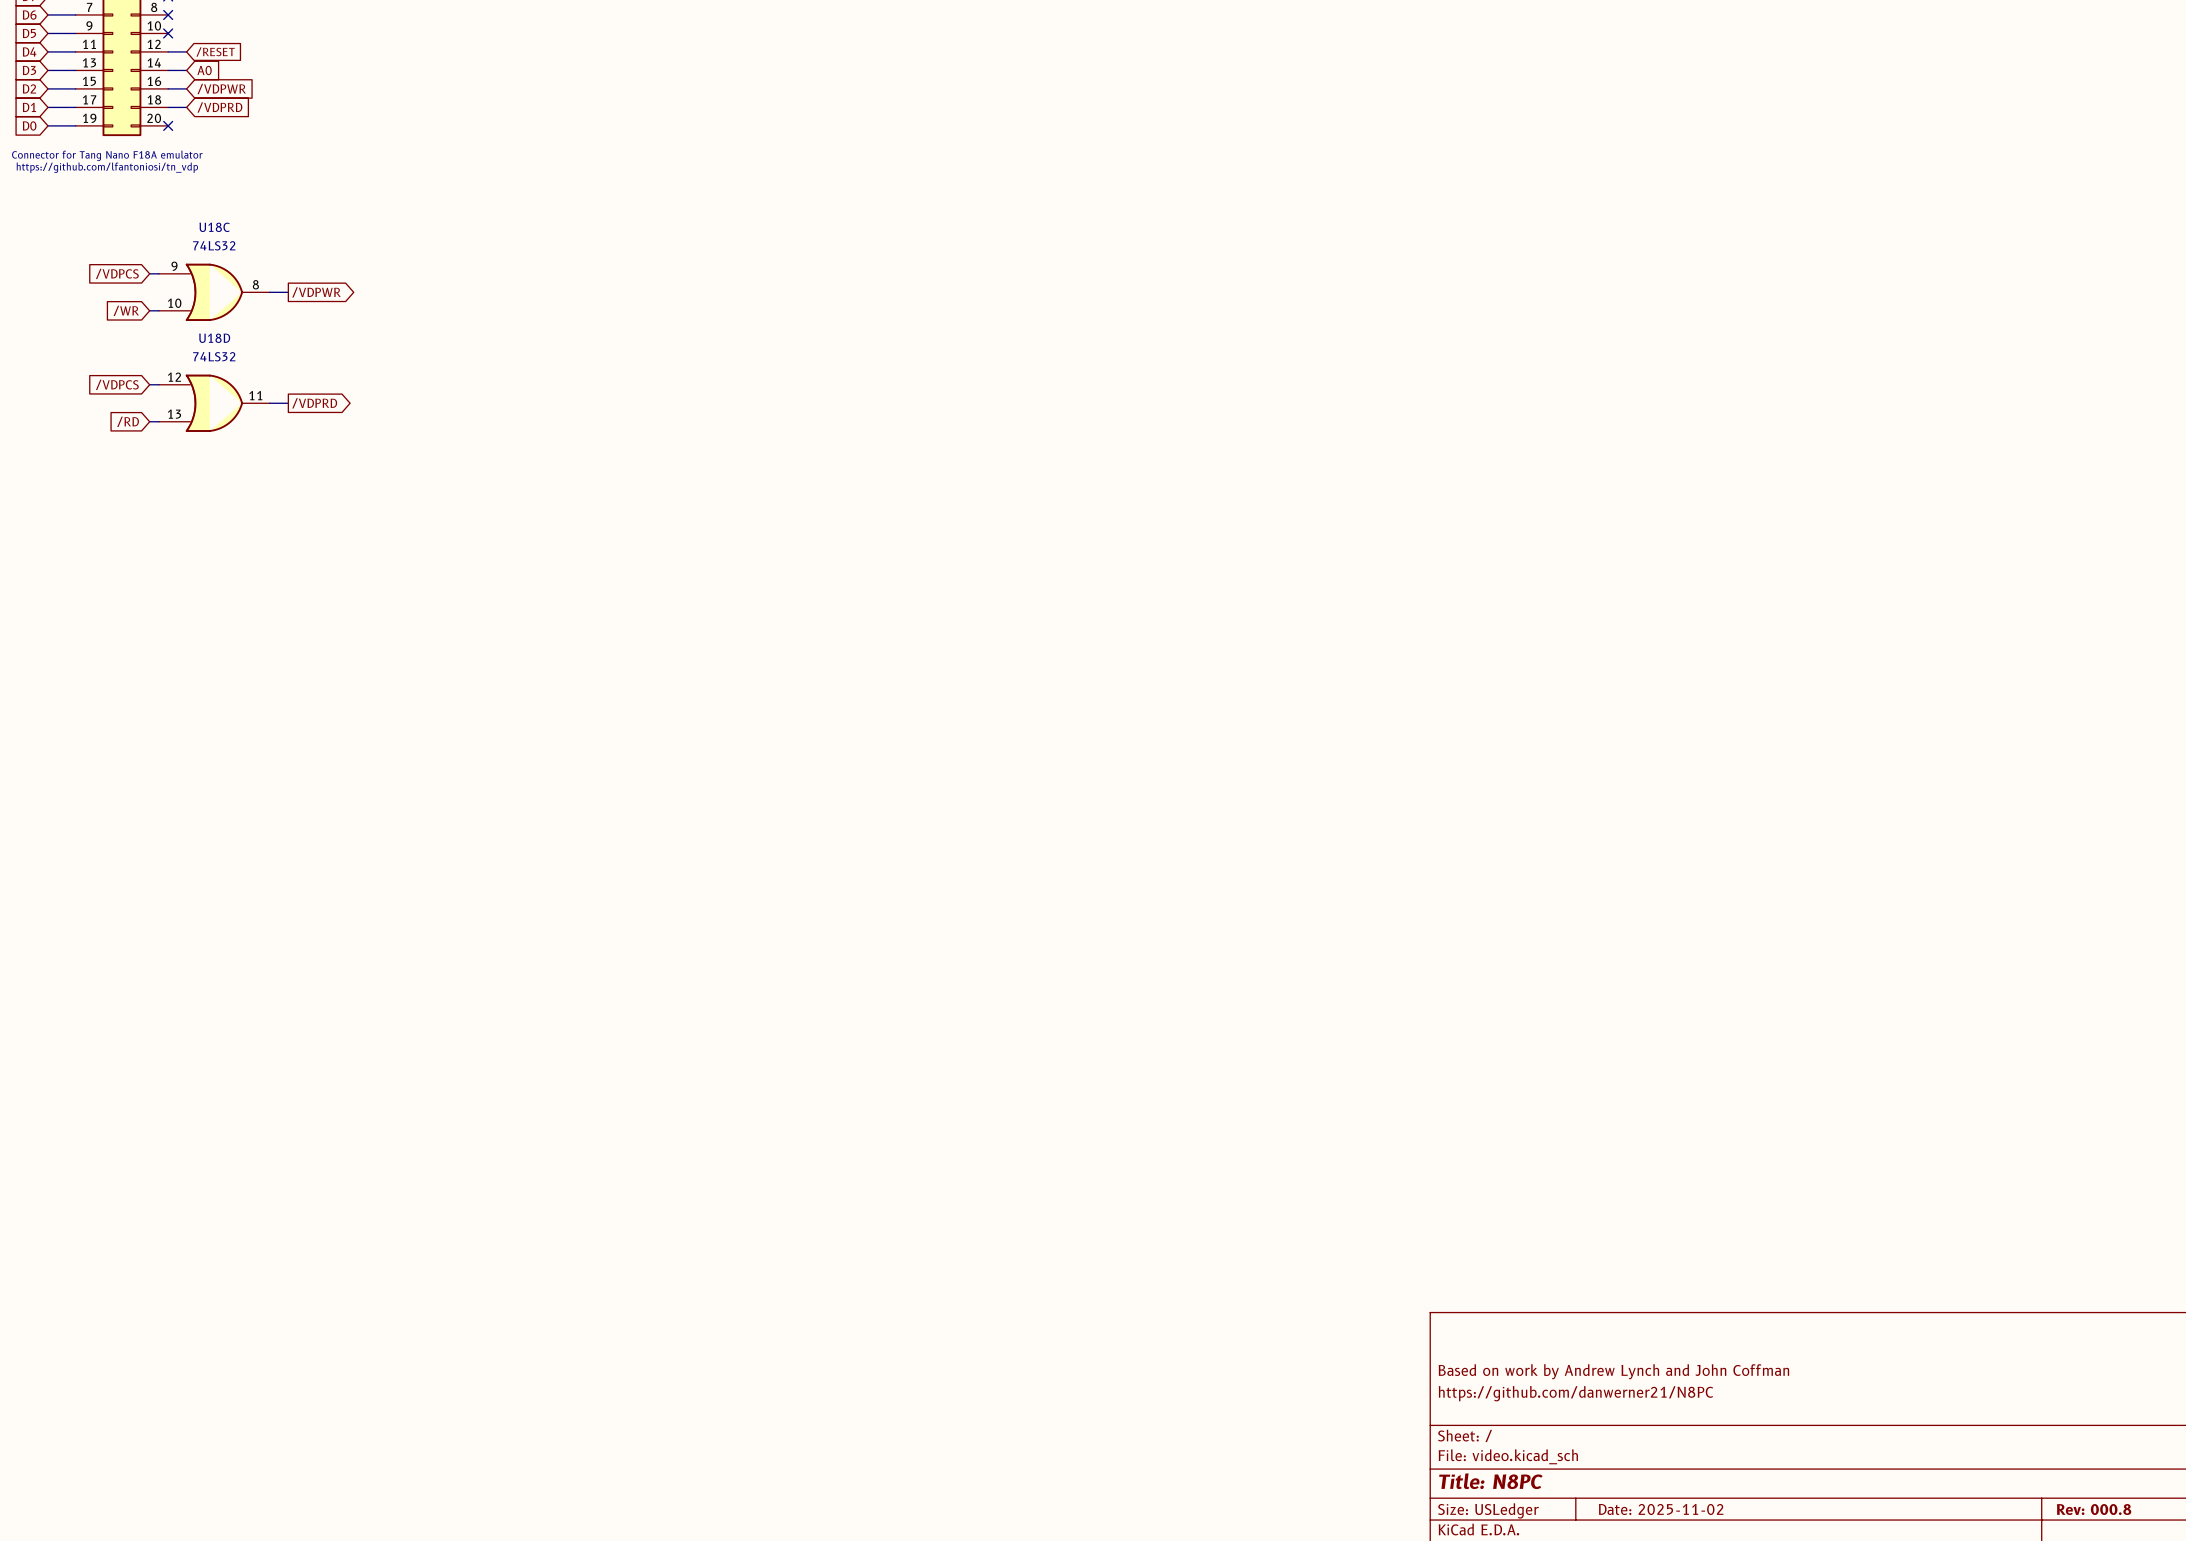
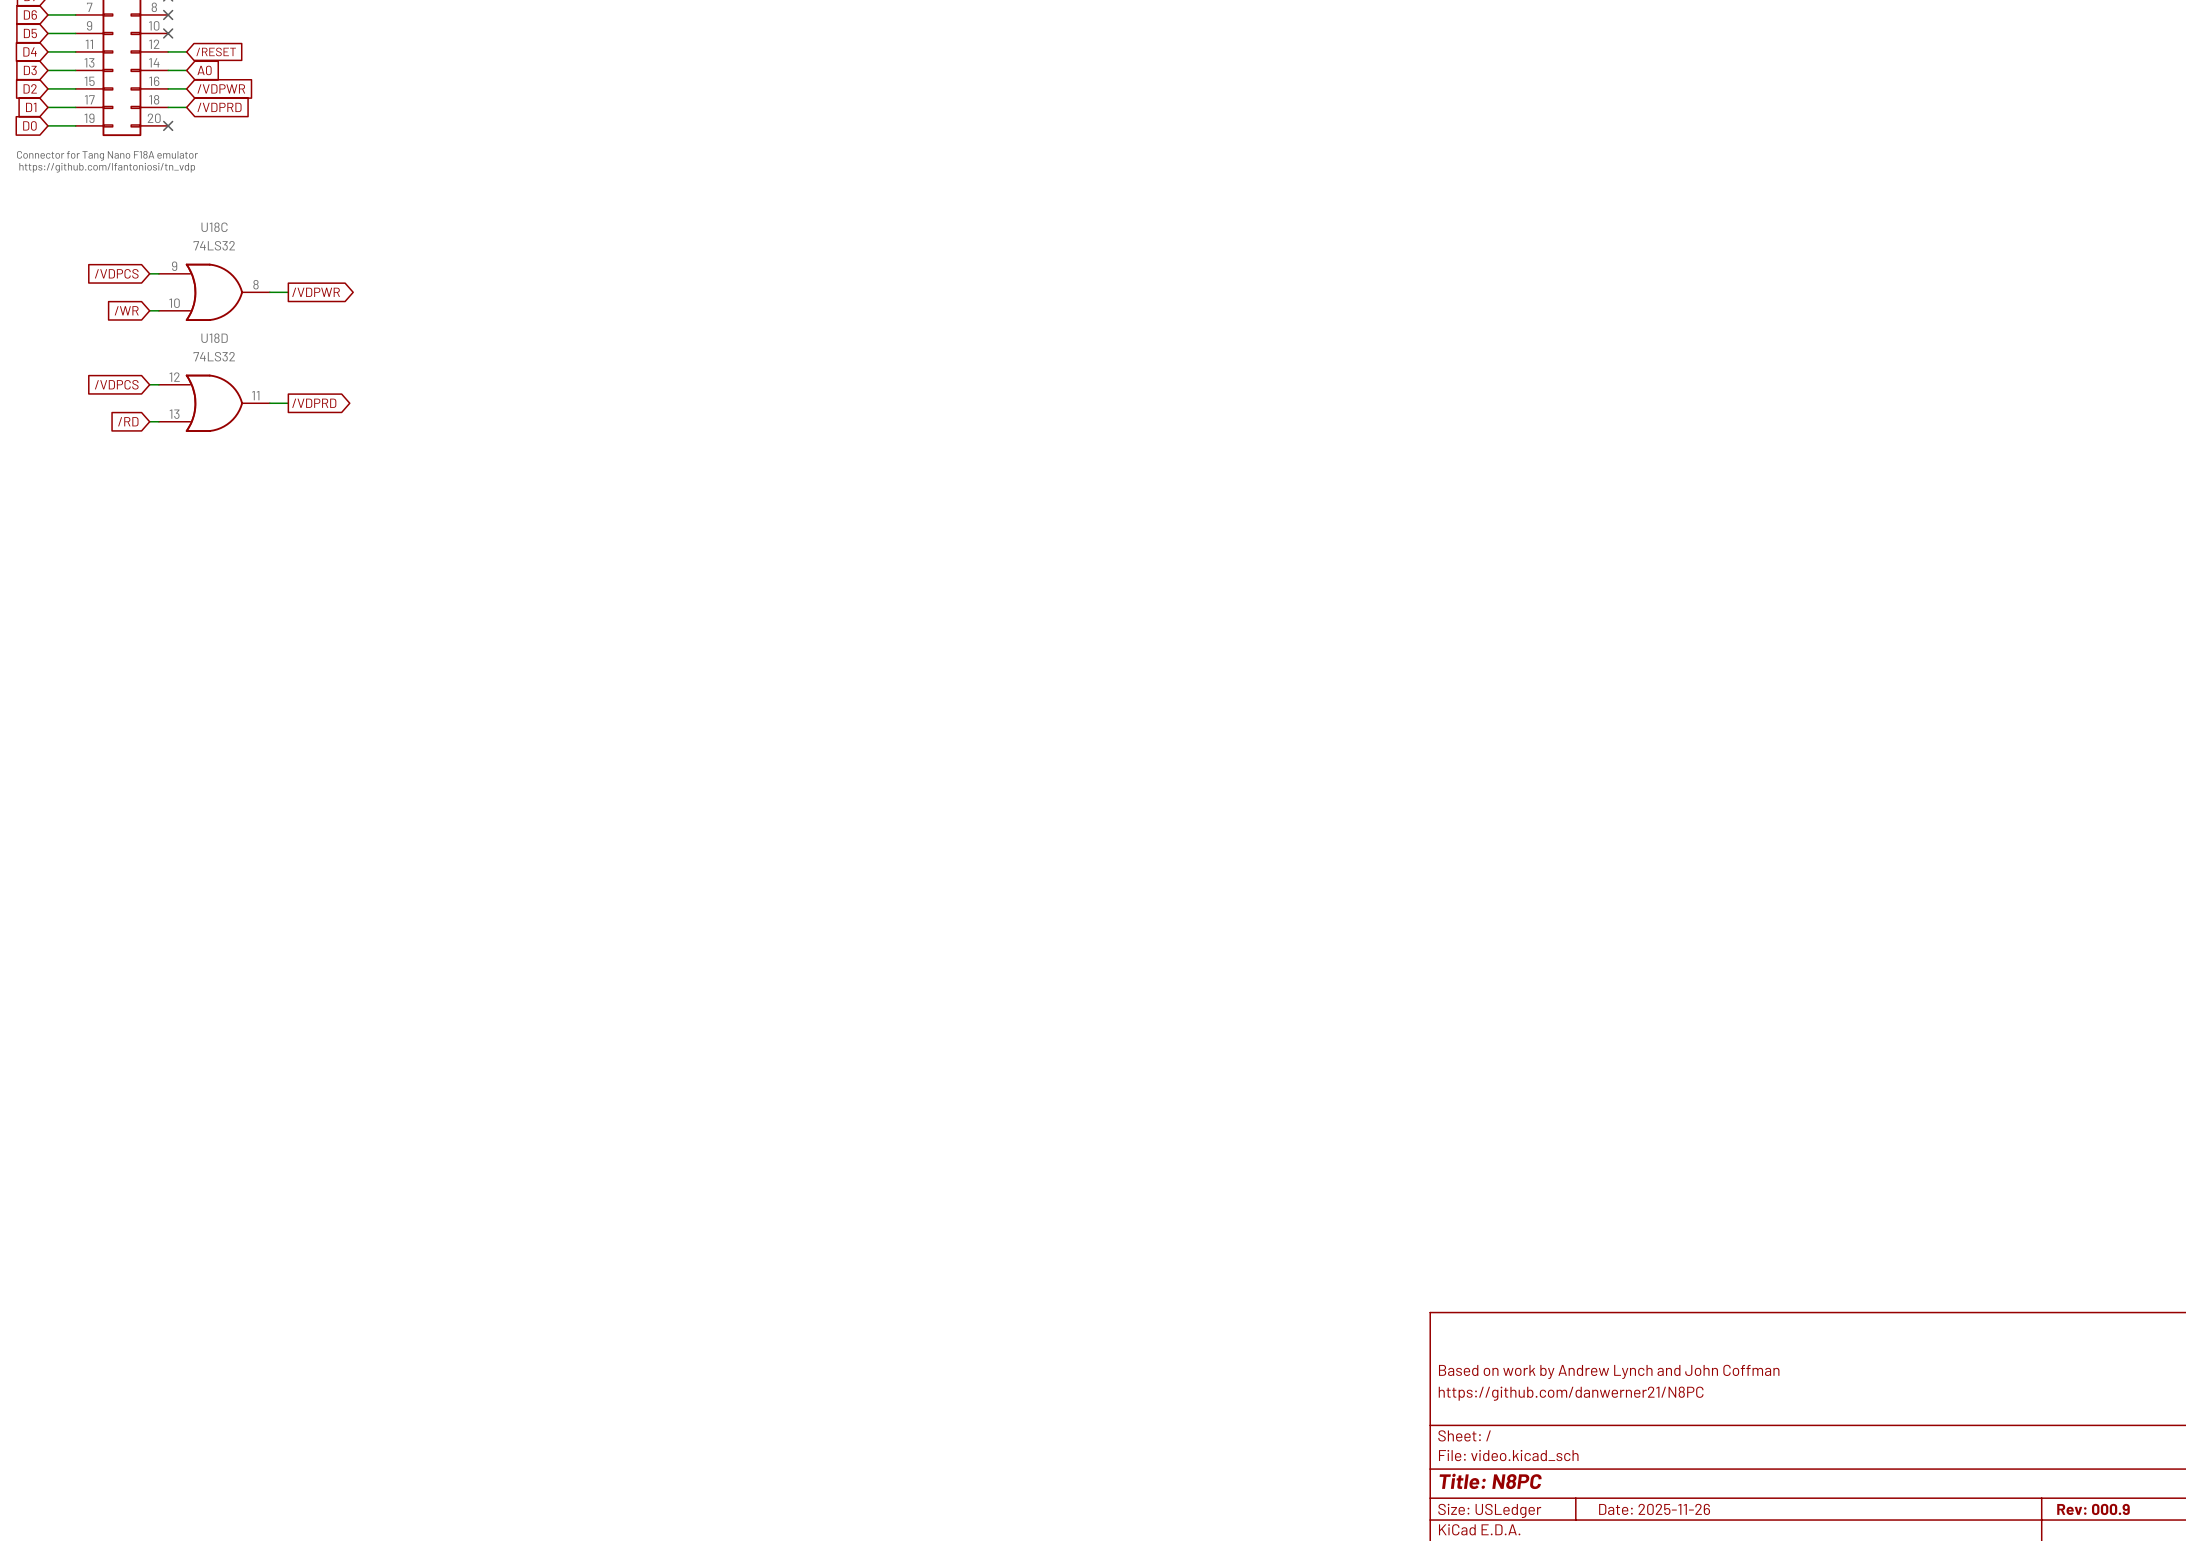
title block: Date: 2025-11-02 (1661, 1509) -> Date: 2025-11-26 (1654, 1509)
title block: Rev: 000.8 (2094, 1509) -> Rev: 000.9 (2093, 1509)

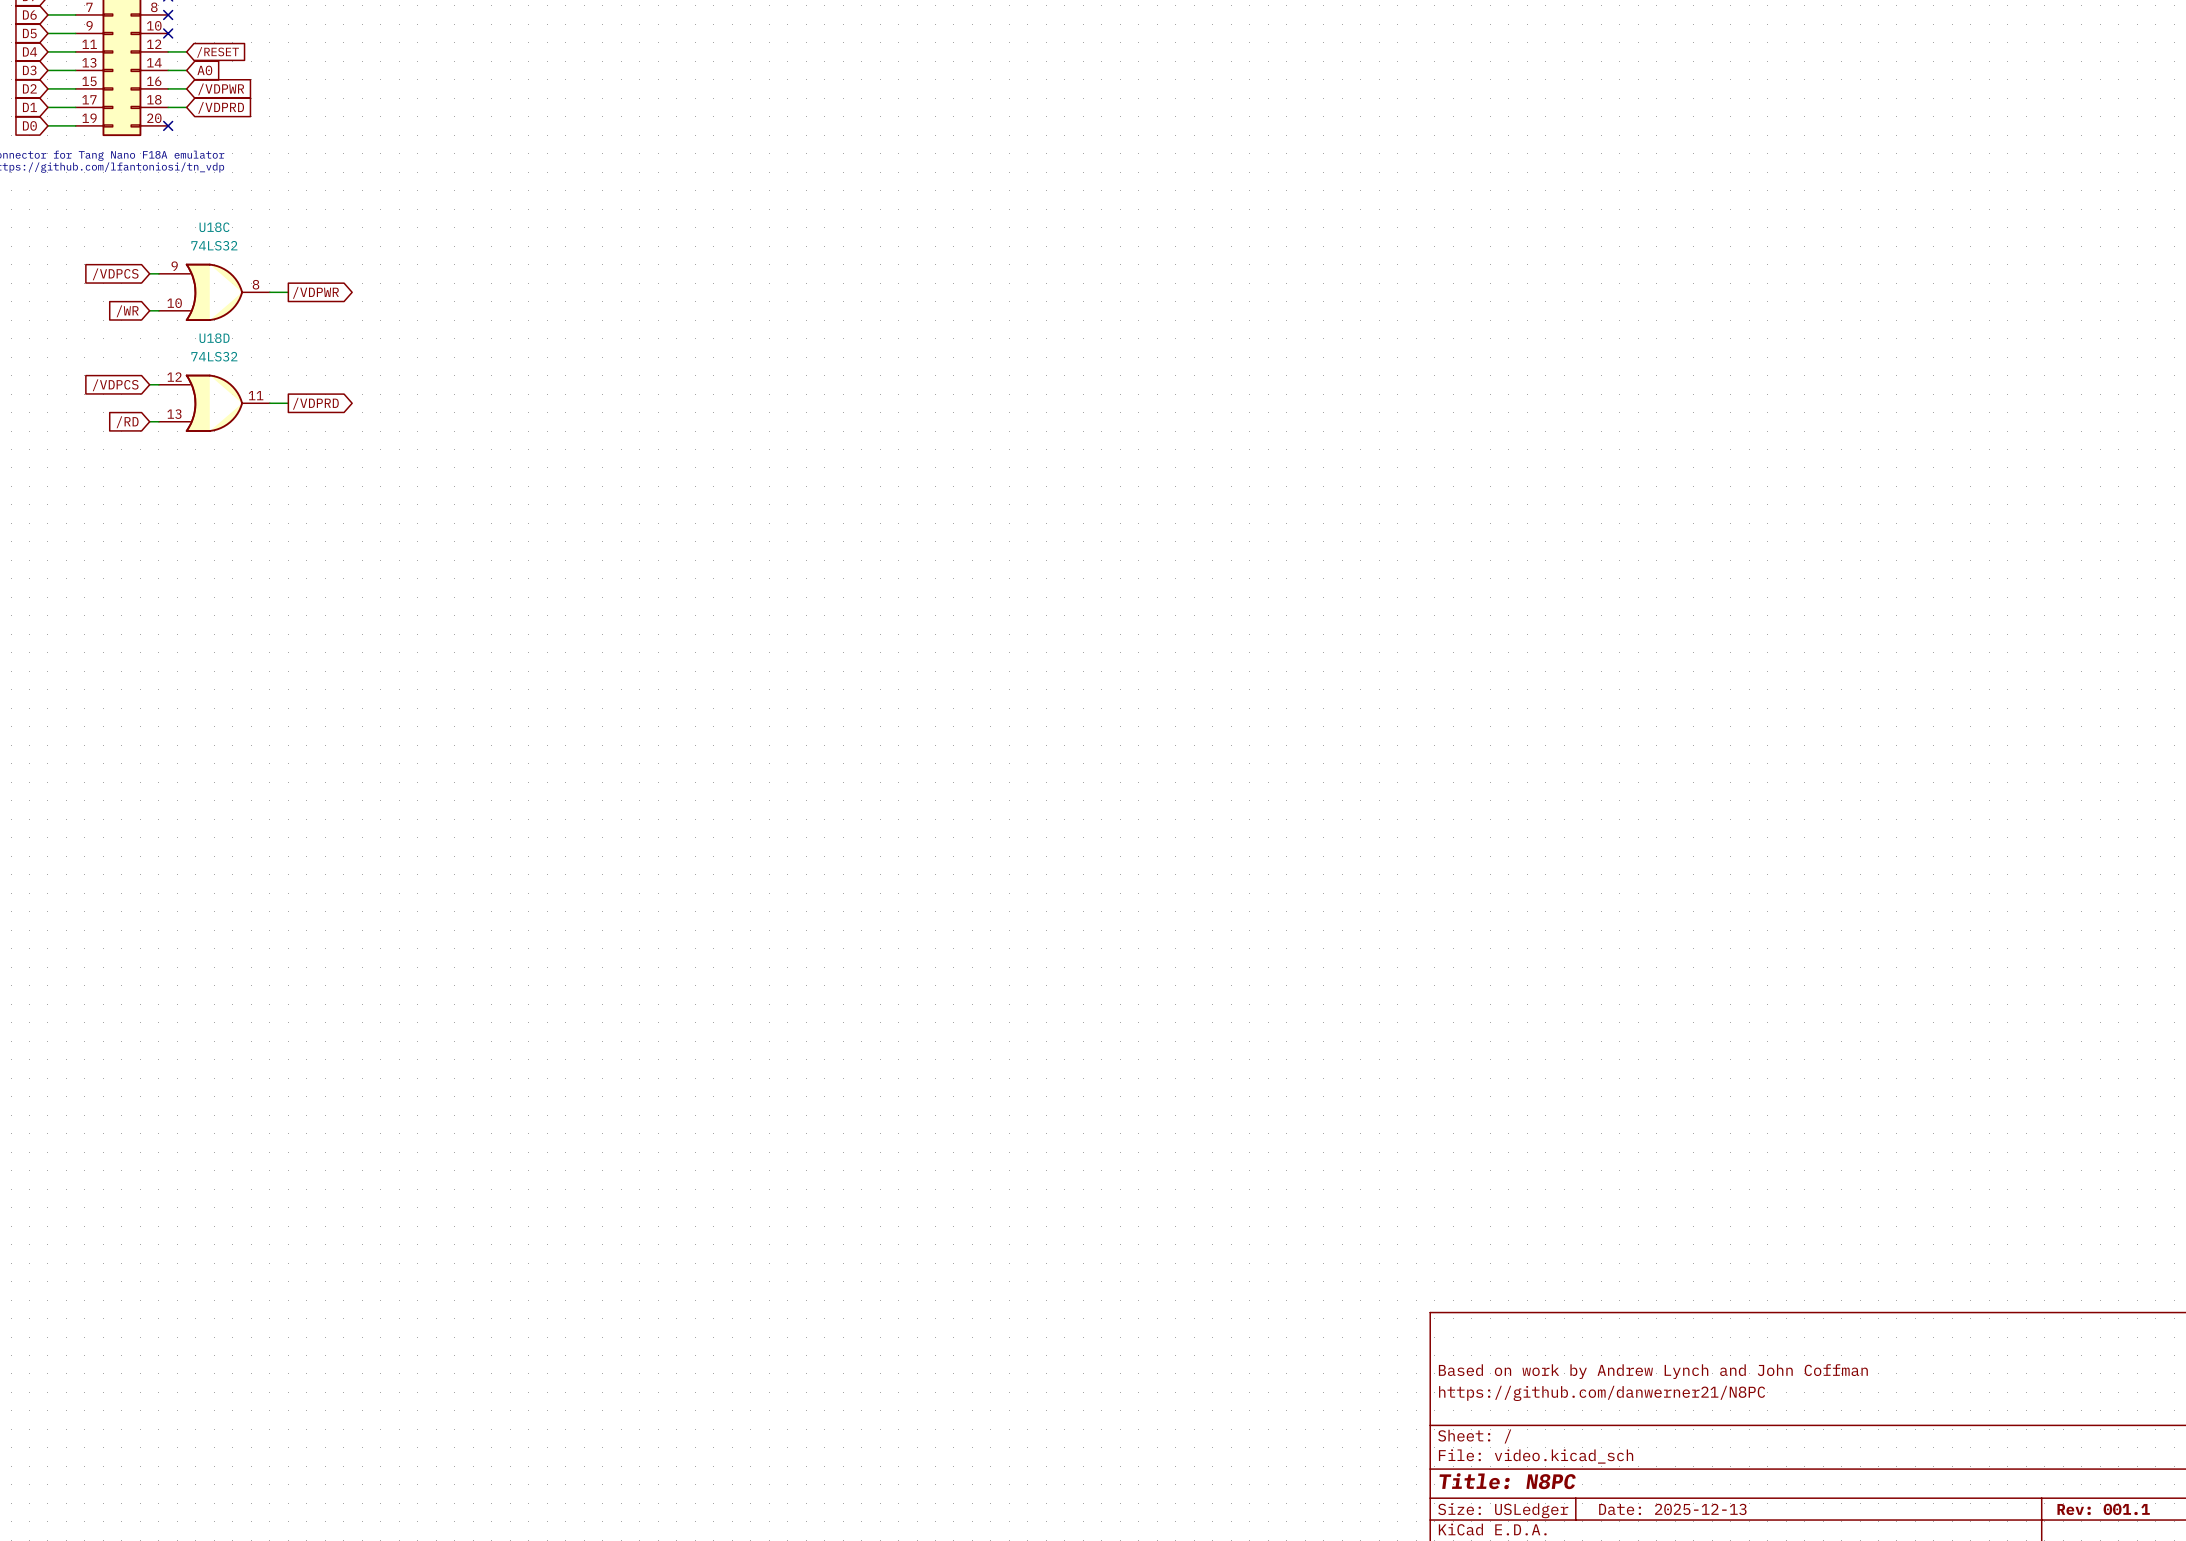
title block: Date: 2025-11-26 (1654, 1509) -> Date: 2025-12-13 (1672, 1509)
title block: Rev: 000.9 (2093, 1509) -> Rev: 001.1 (2103, 1509)

